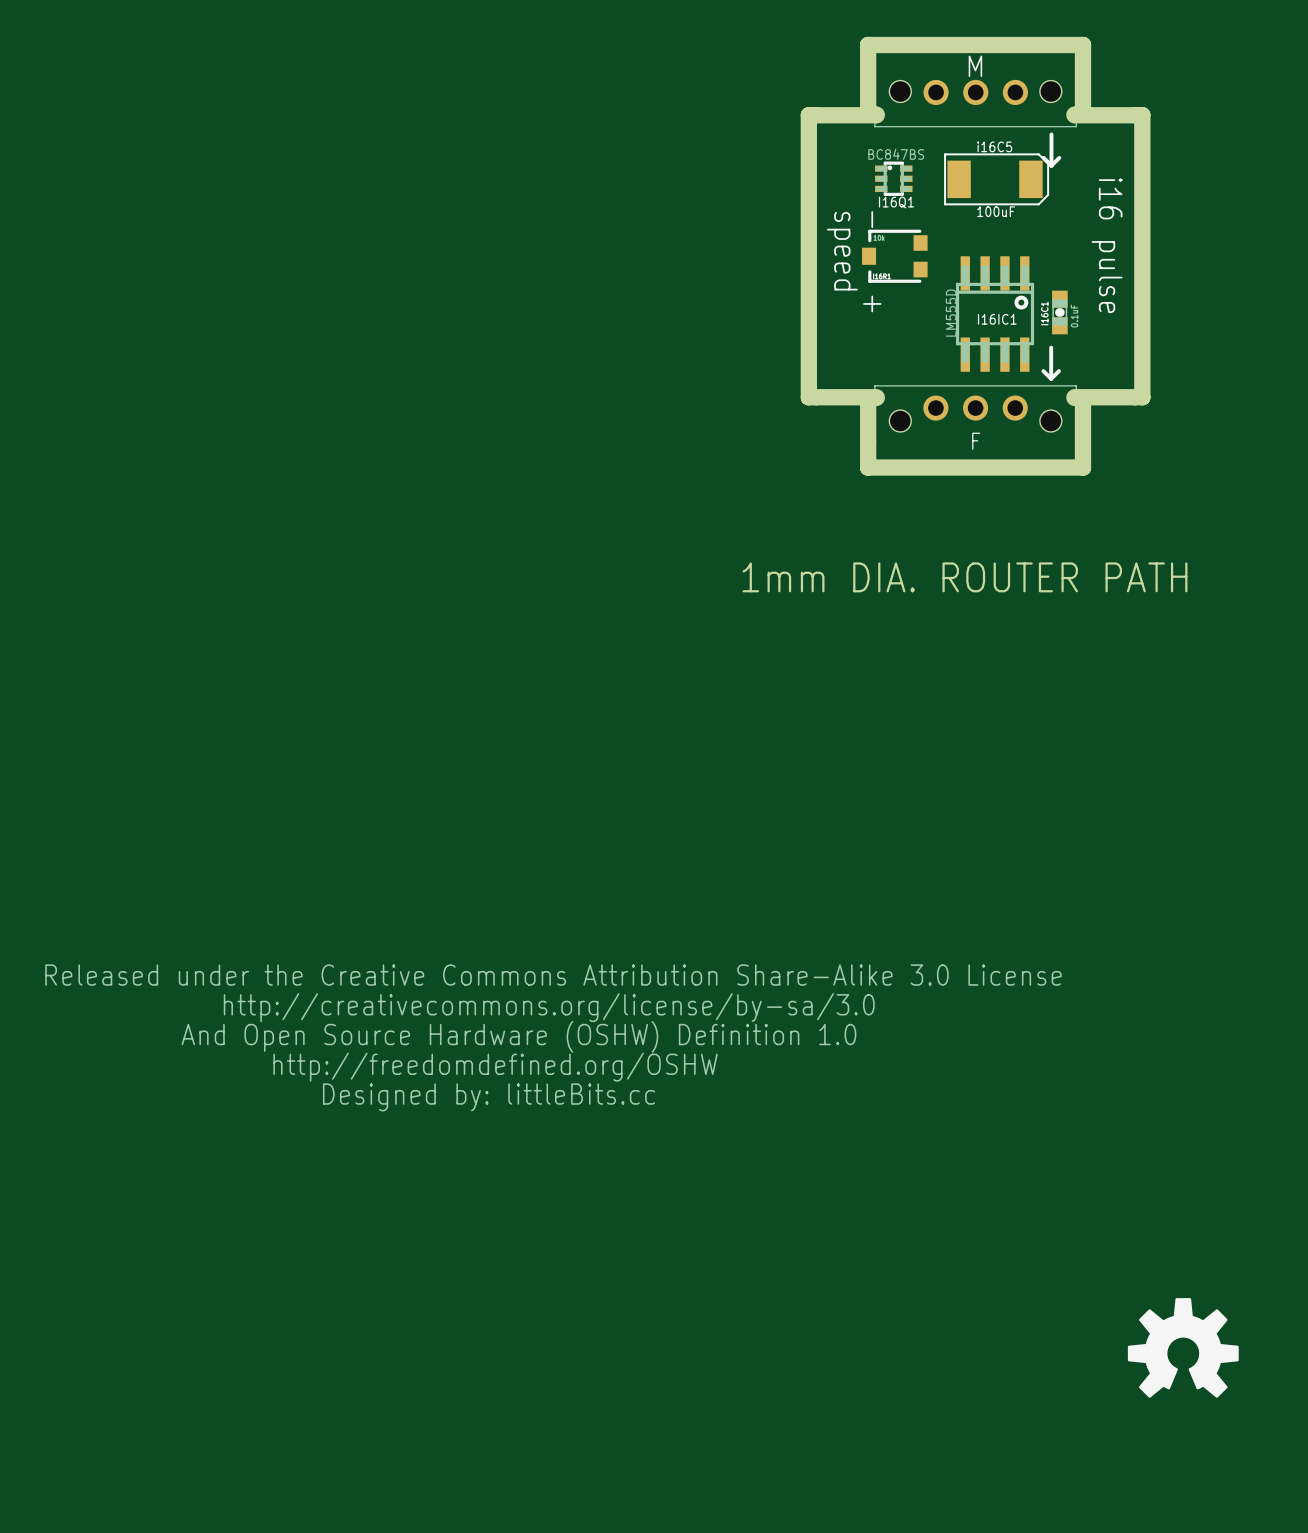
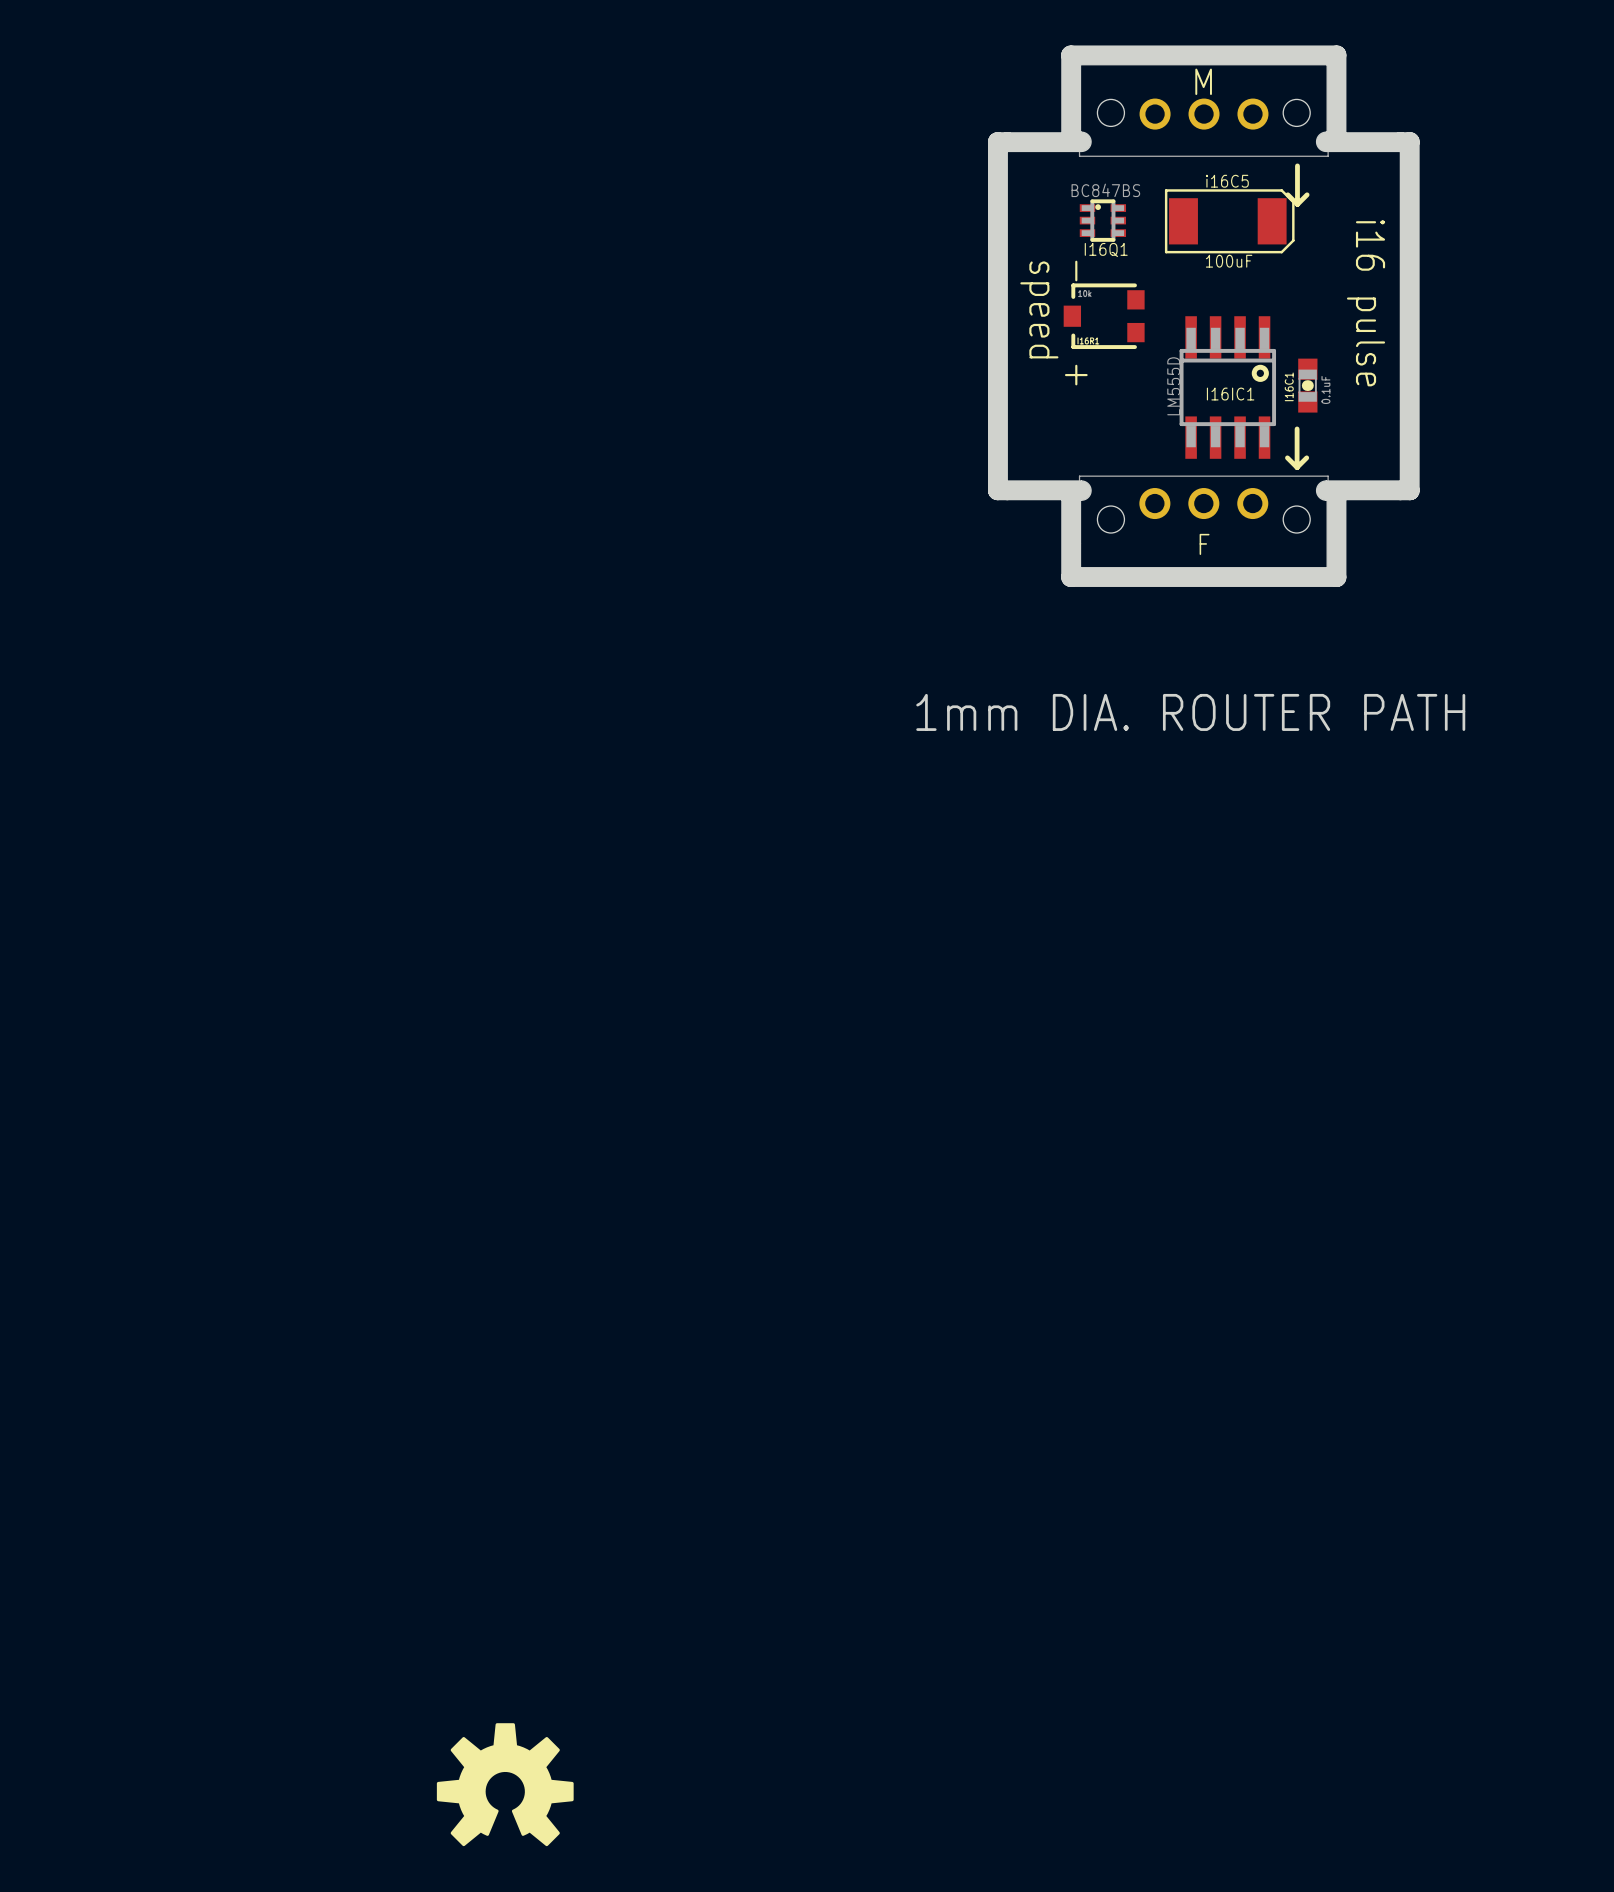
drawing: [45, 964, 1062, 1112] -> none
drawing: [1127, 1298, 1239, 1398] -> none
drawing: none -> [436, 1723, 574, 1847]

